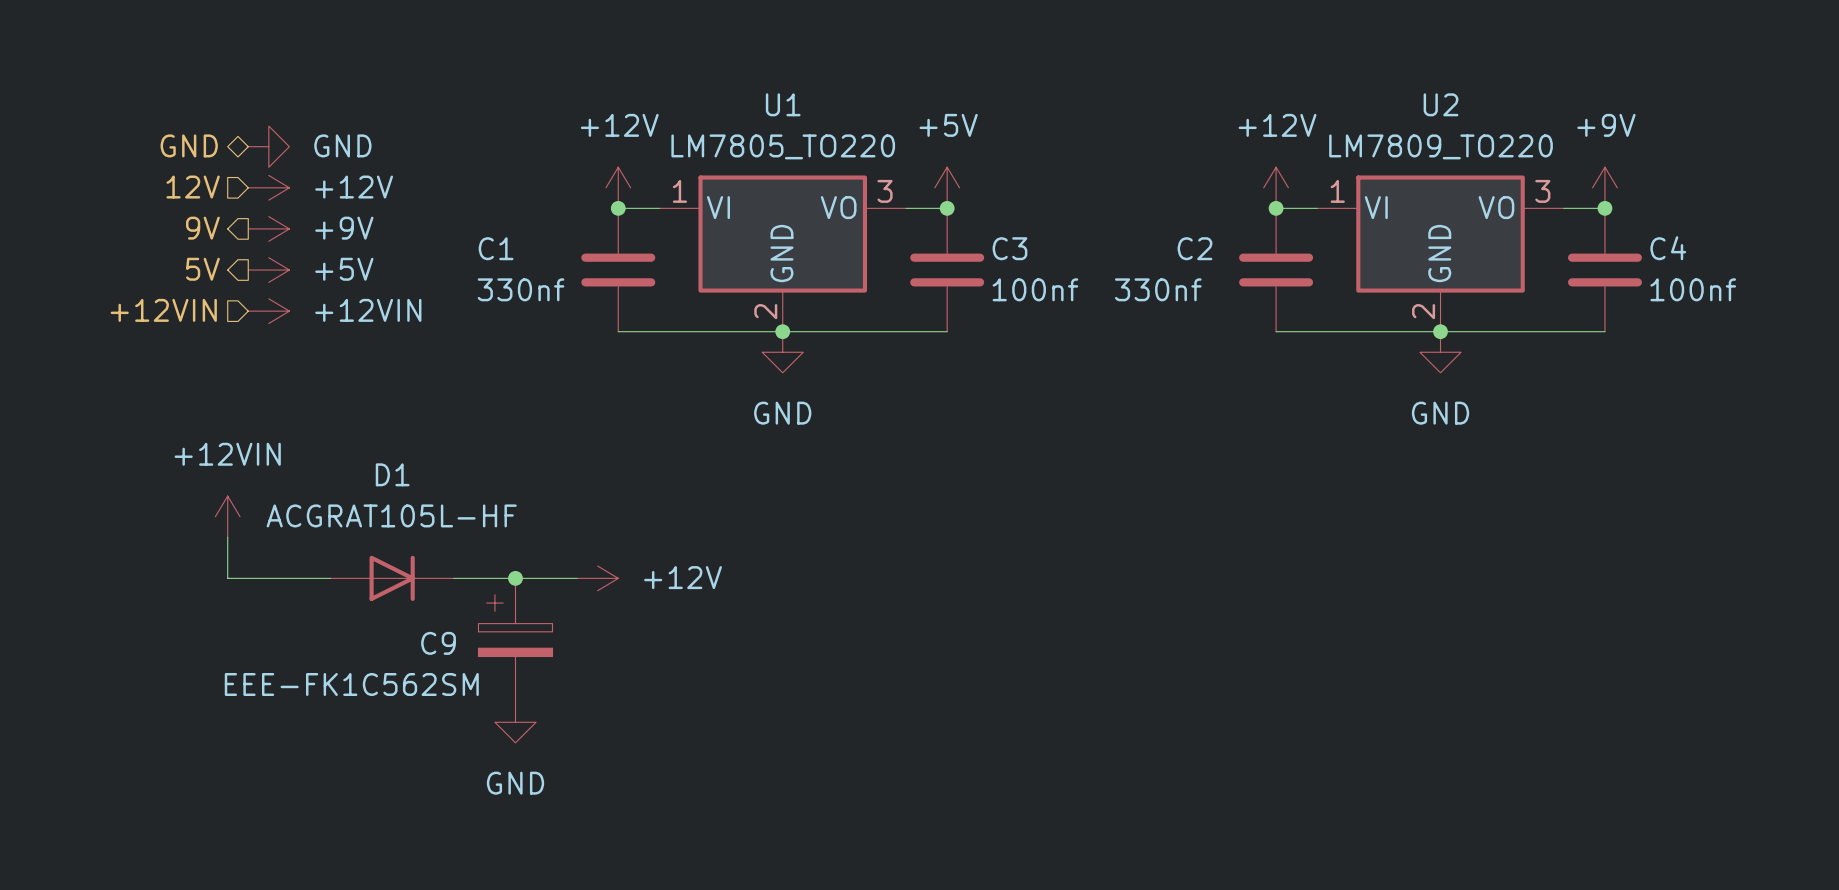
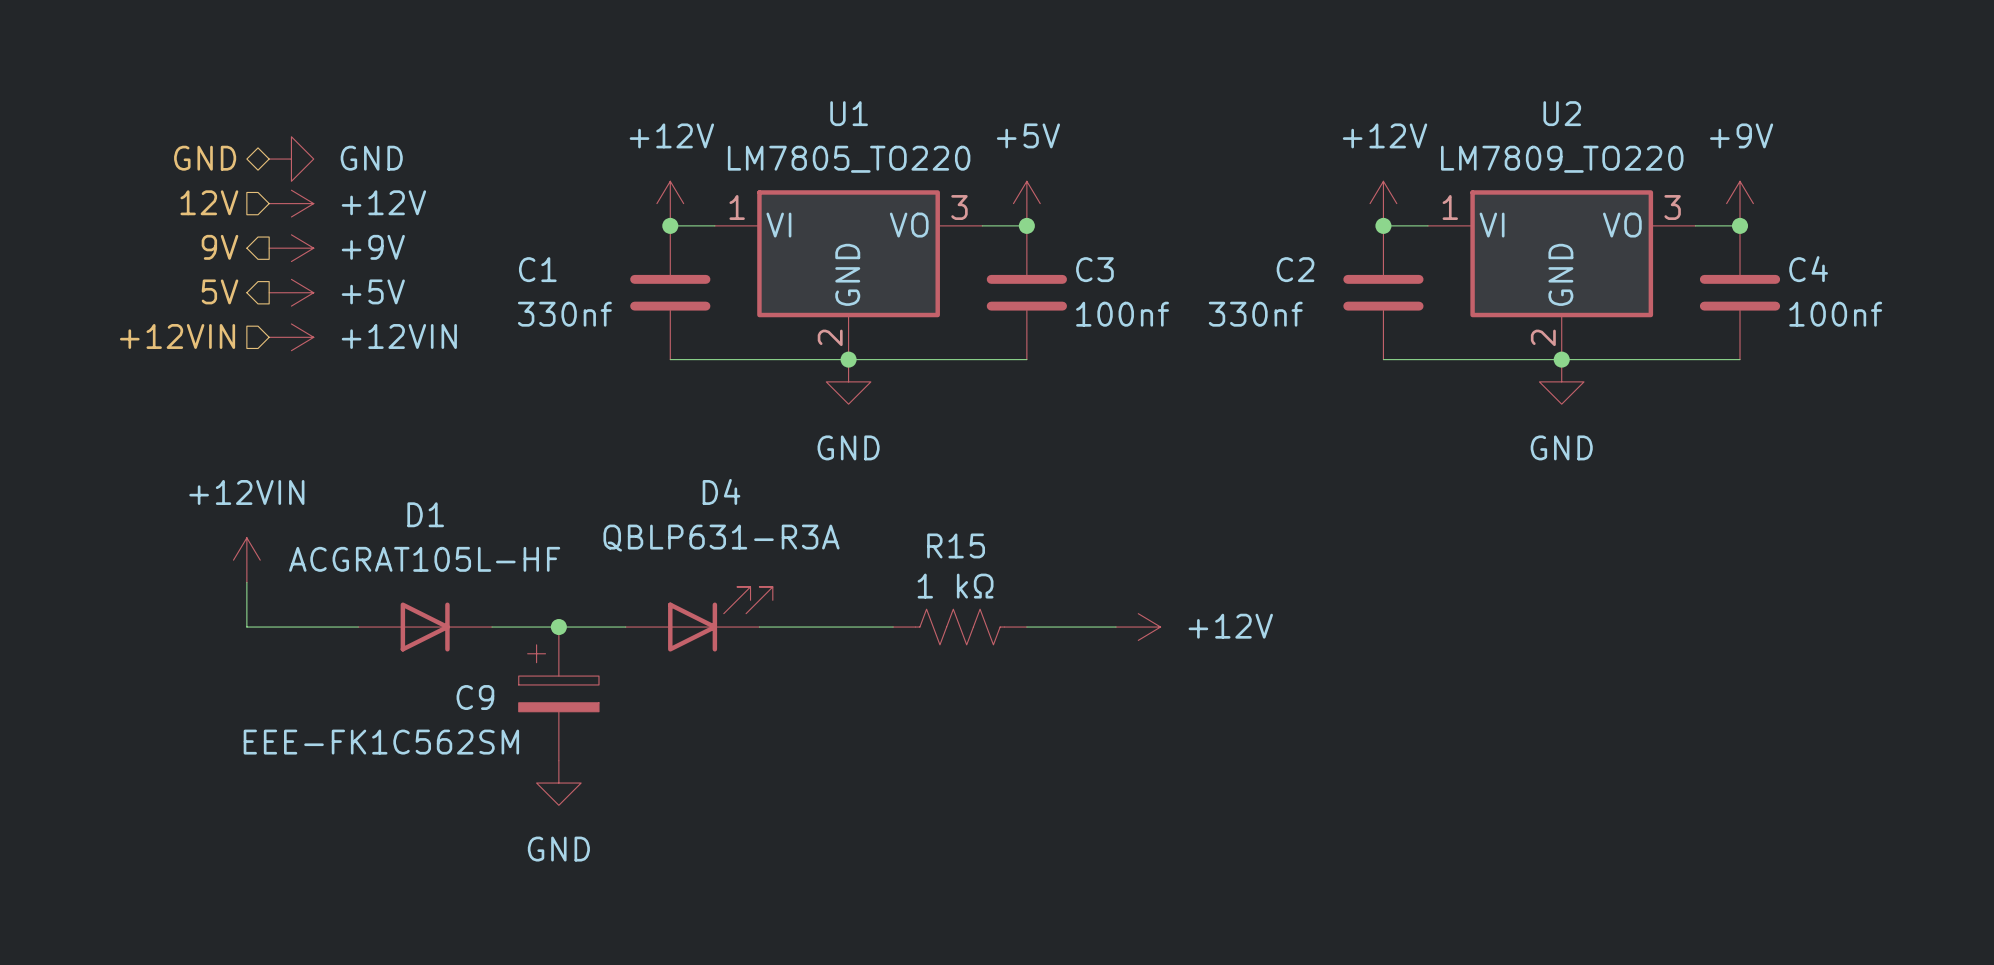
D4: none -> QBLP631-R3A (699, 619)
power symbol: +12V (597, 578) -> none
wire: none -> (759, 627) (893, 627)
R15: none -> 1 kΩ (960, 627)
wire: none -> (1026, 627) (1116, 627)
power symbol: none -> +12V (1138, 627)

